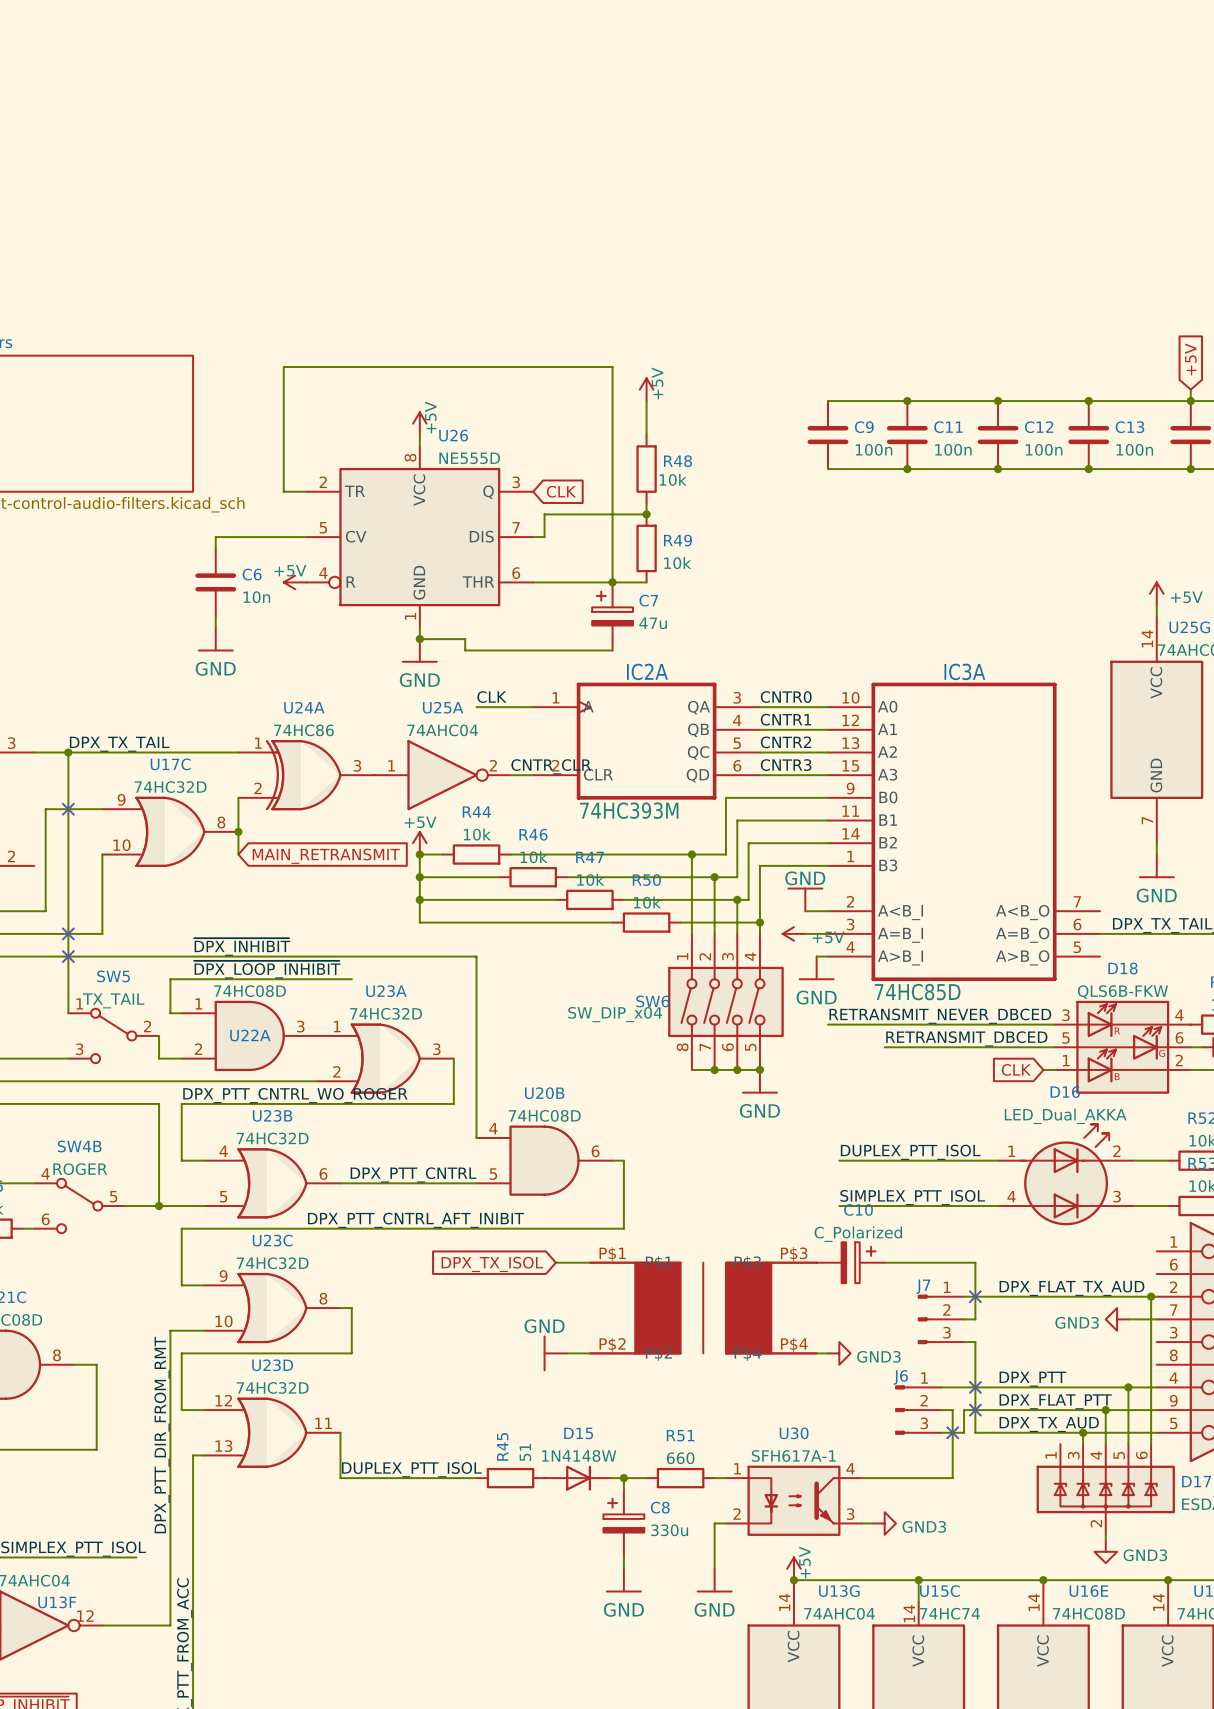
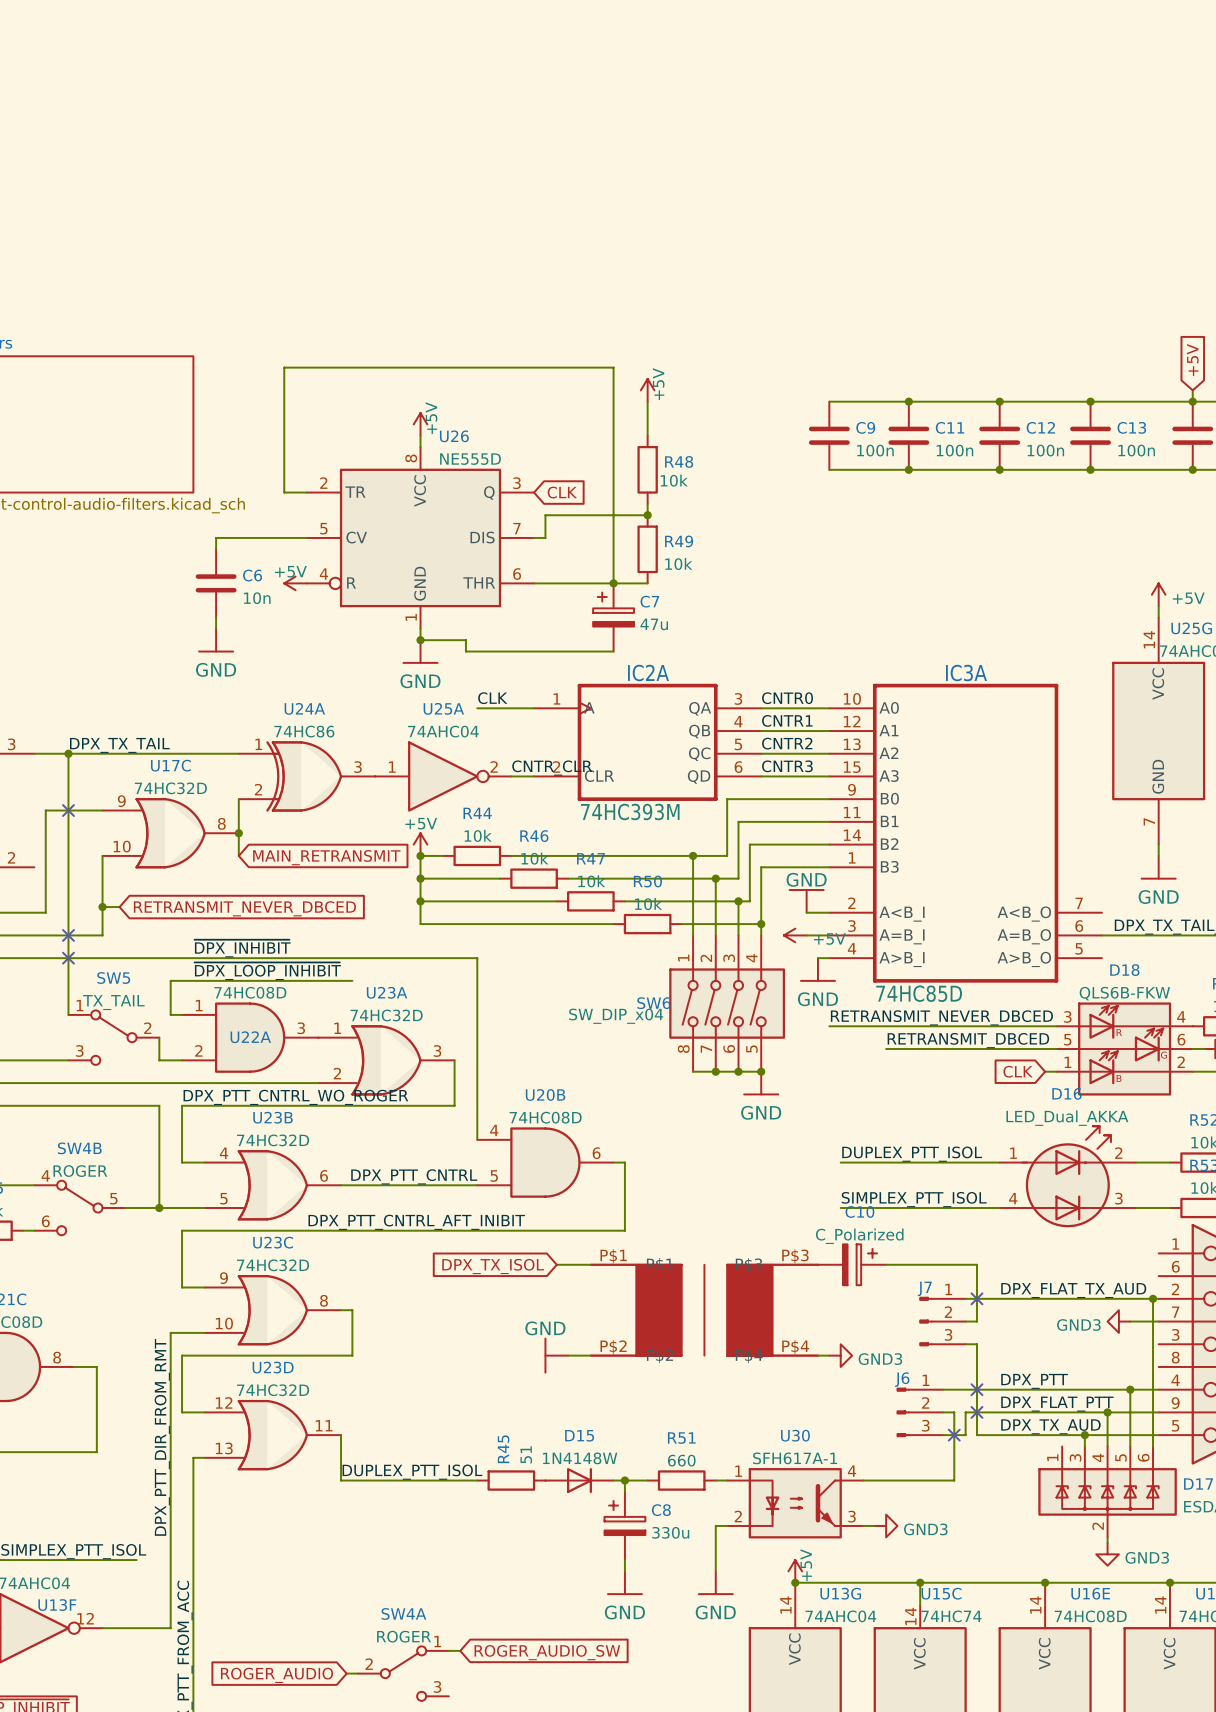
wire: none -> (102, 907) (119, 907)
junction: none -> (102, 907)
global label: none -> RETRANSMIT_NEVER_DBCED (244, 908)
wire: none -> (448, 1650) (460, 1650)
global label: none -> ROGER_AUDIO_SW (547, 1652)
wire: none -> (346, 1673) (358, 1673)
SW4A: none -> ROGER (403, 1673)
global label: none -> ROGER_AUDIO (277, 1675)

